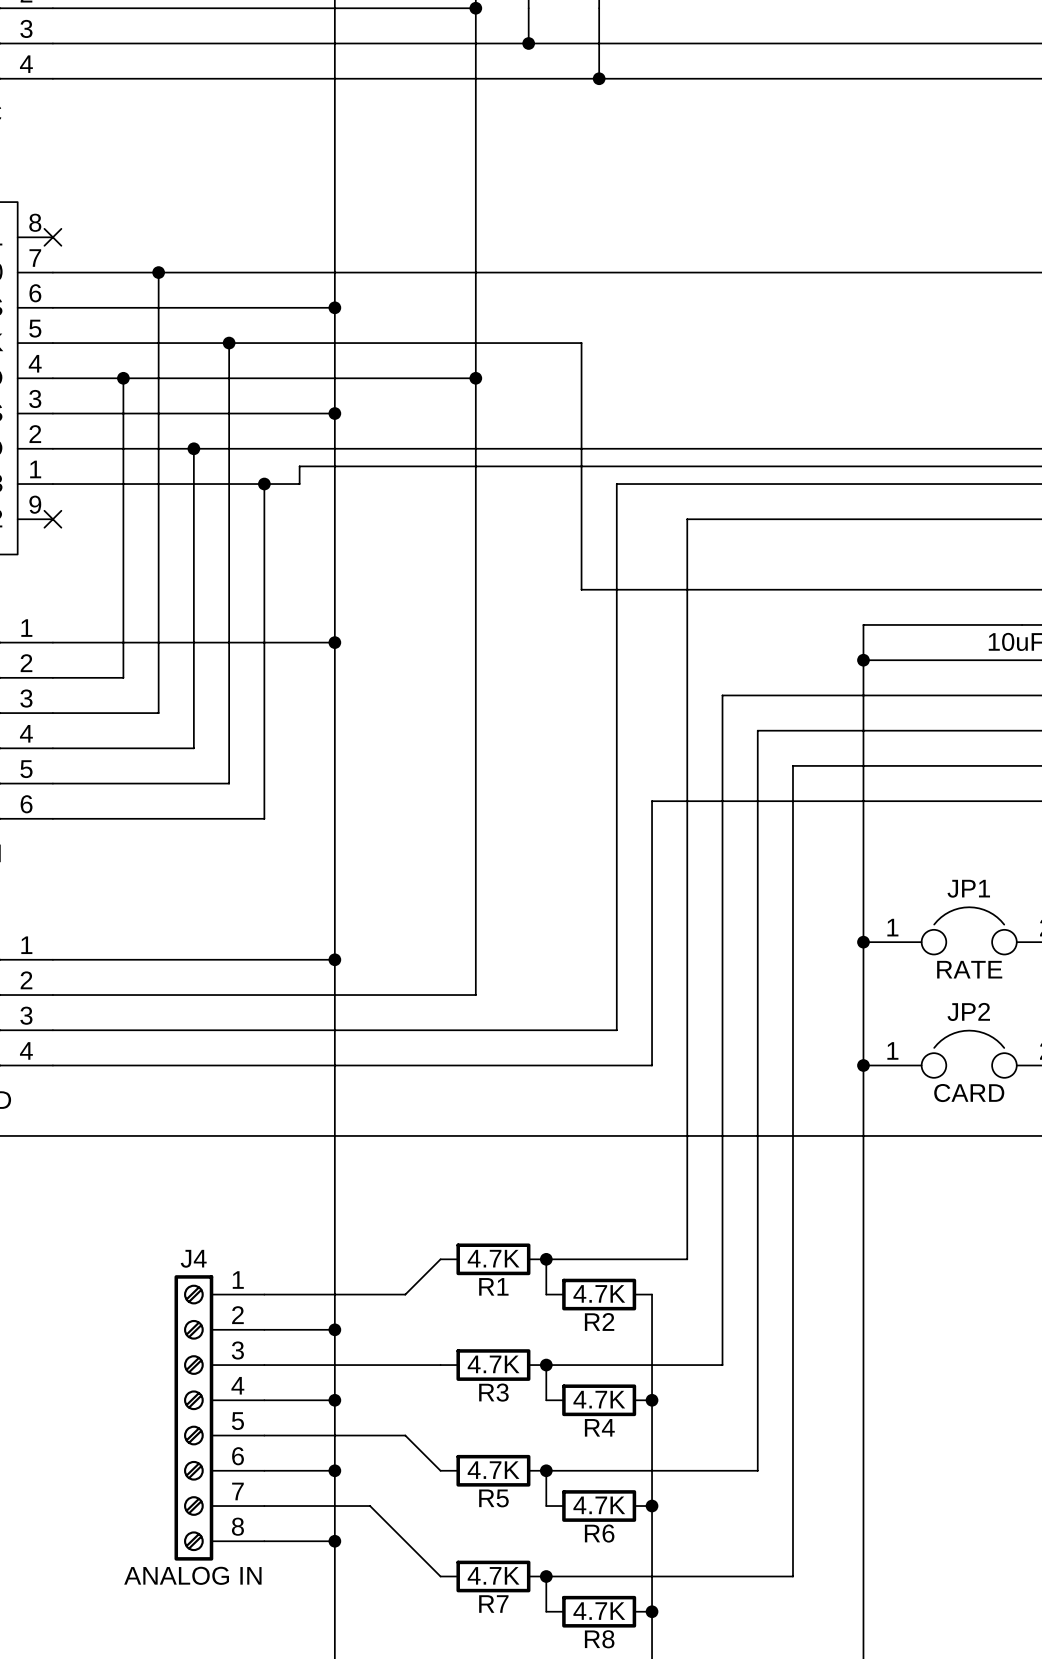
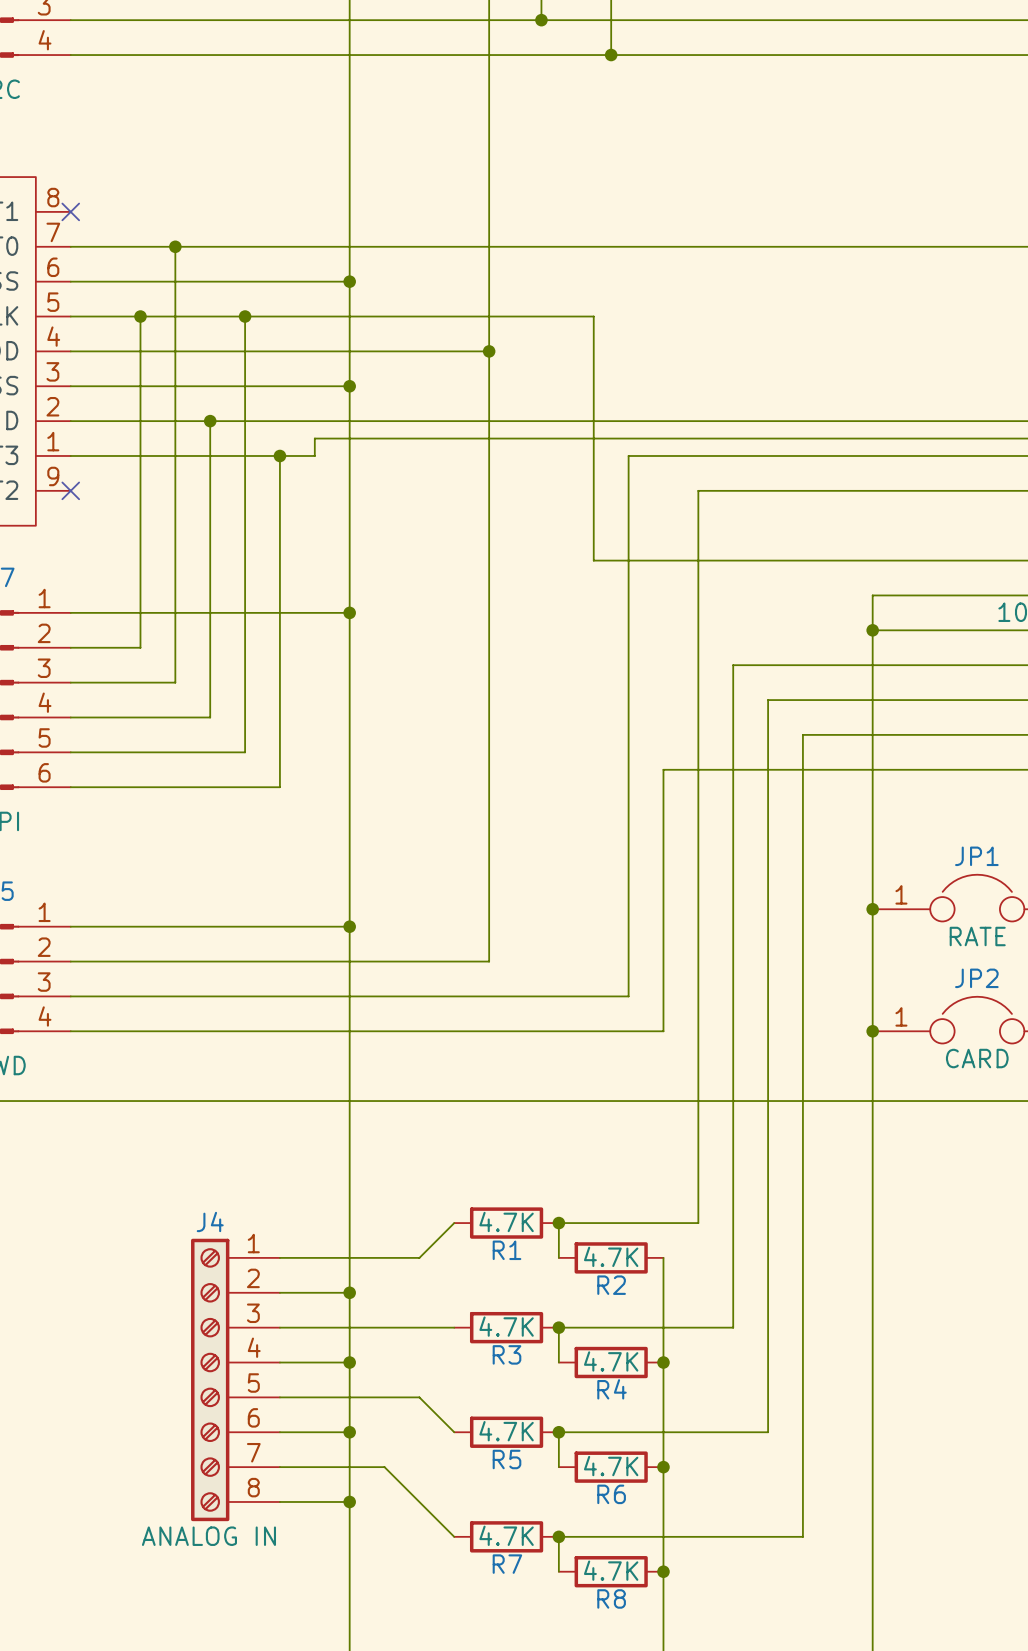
wire: none -> (140, 316) (140, 351)
junction position: (123, 378) -> (140, 316)

